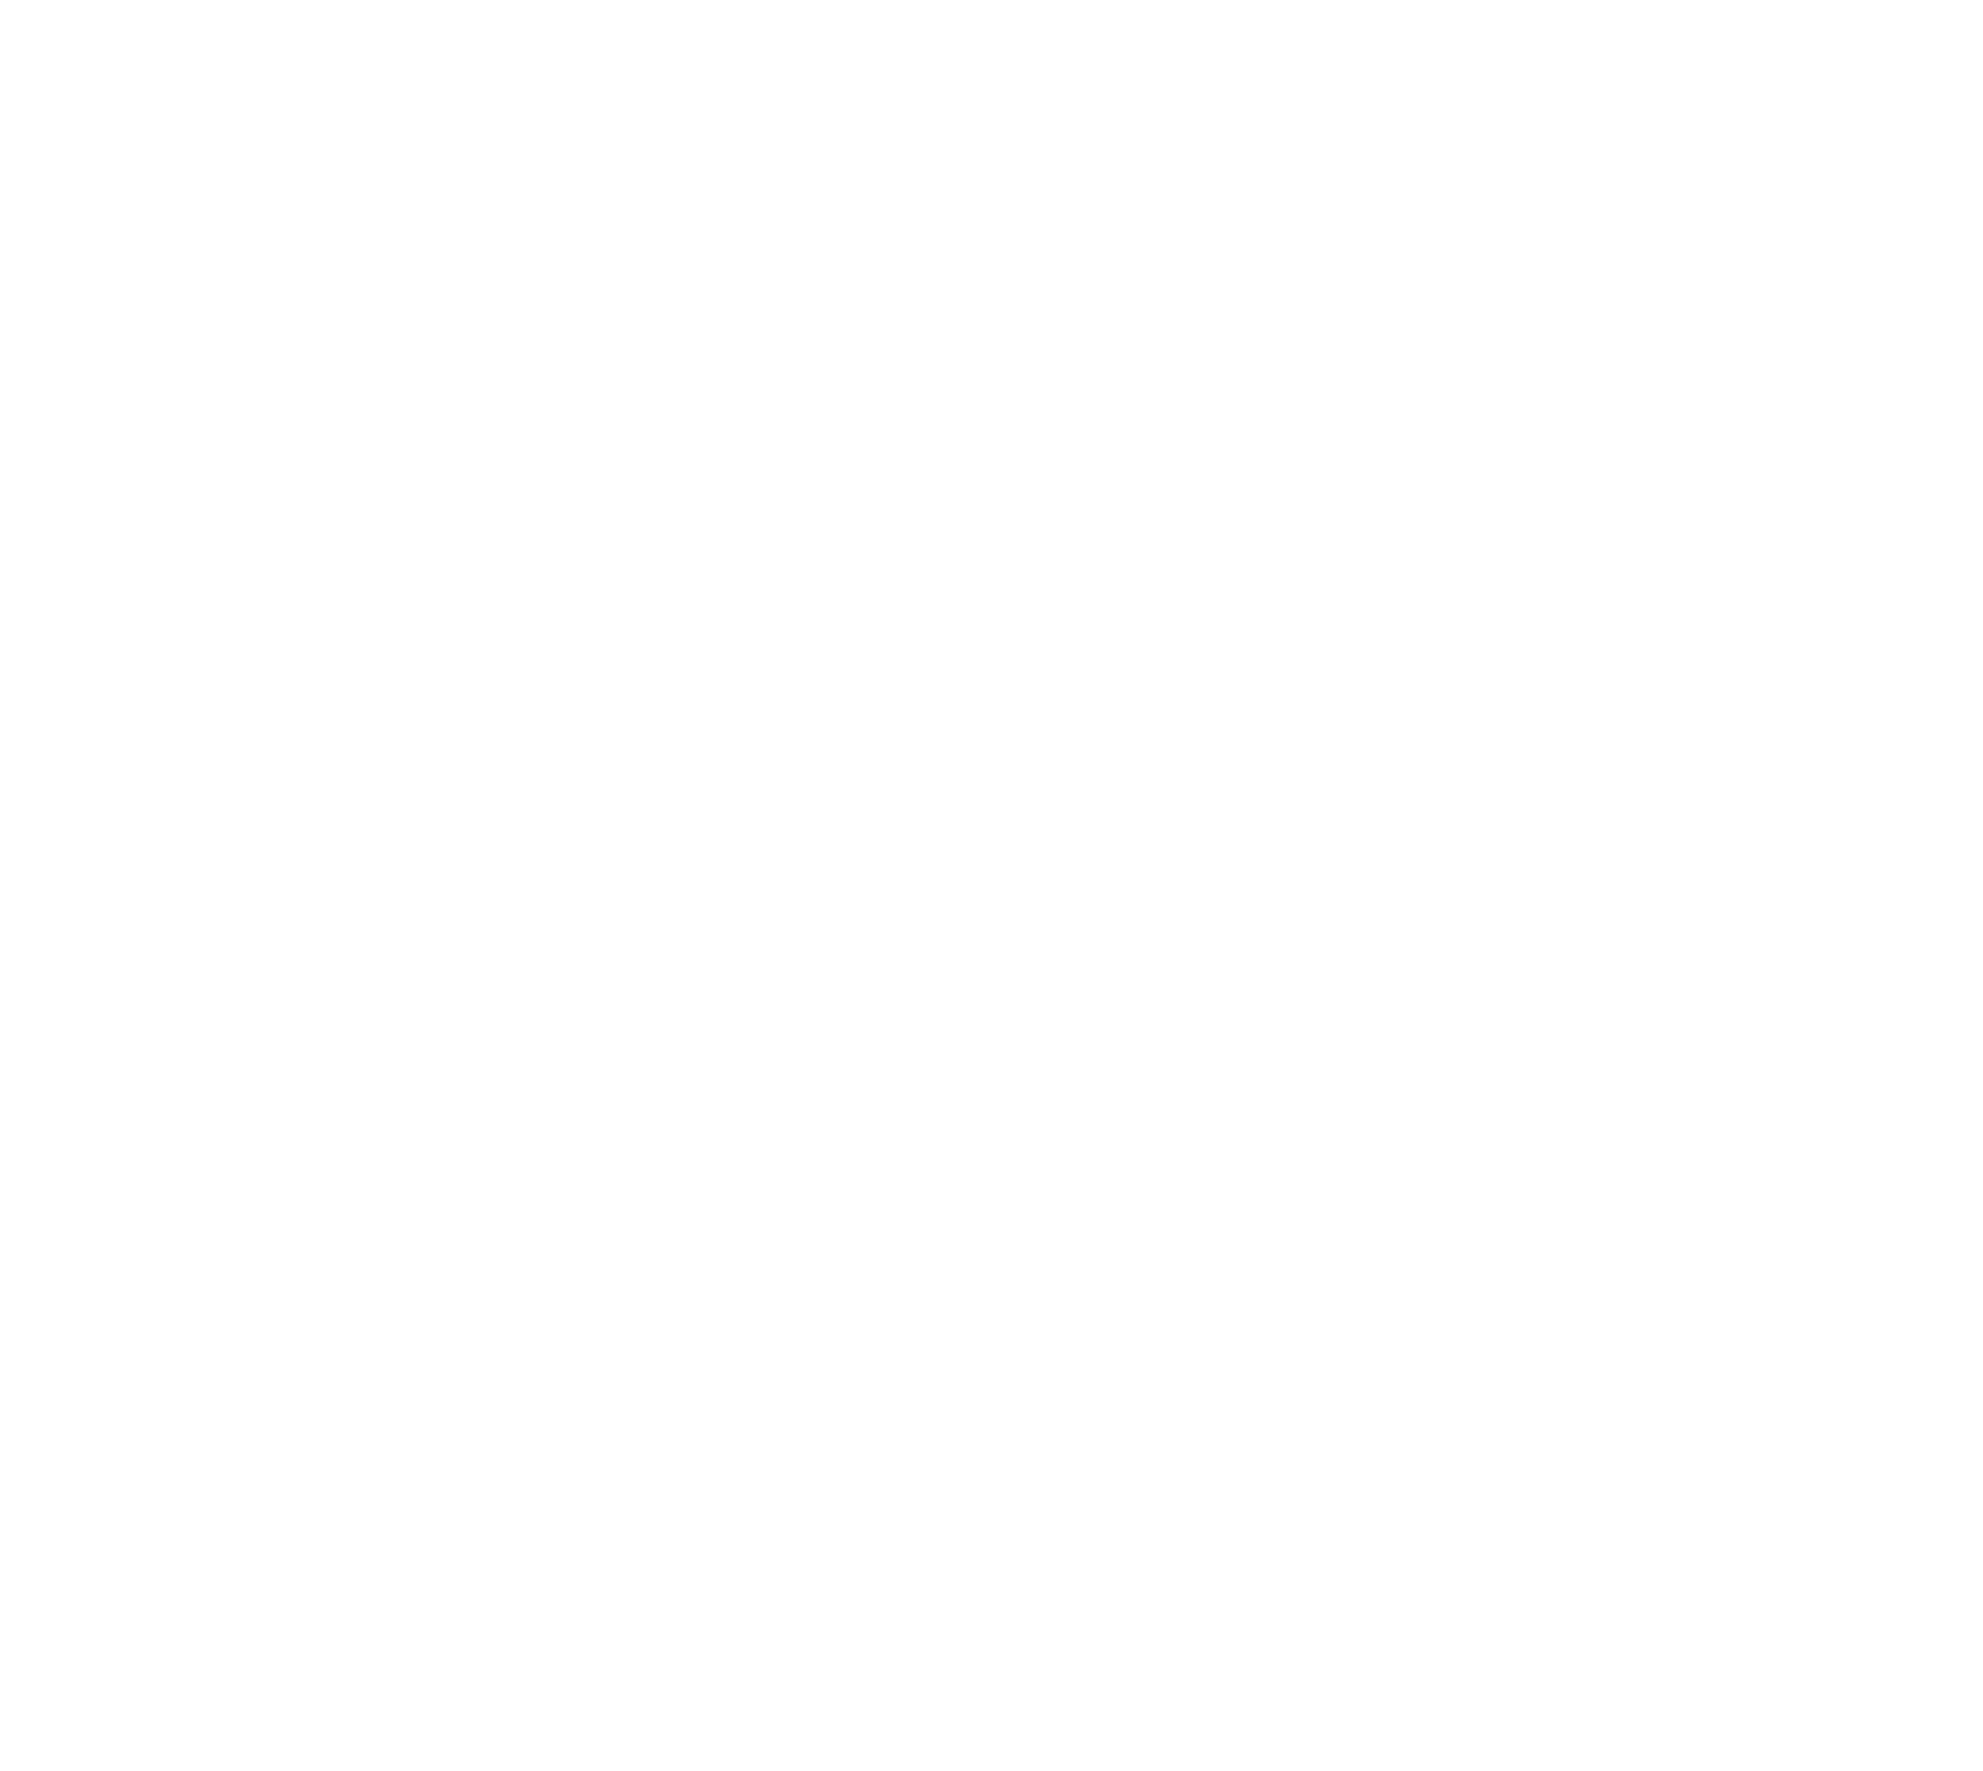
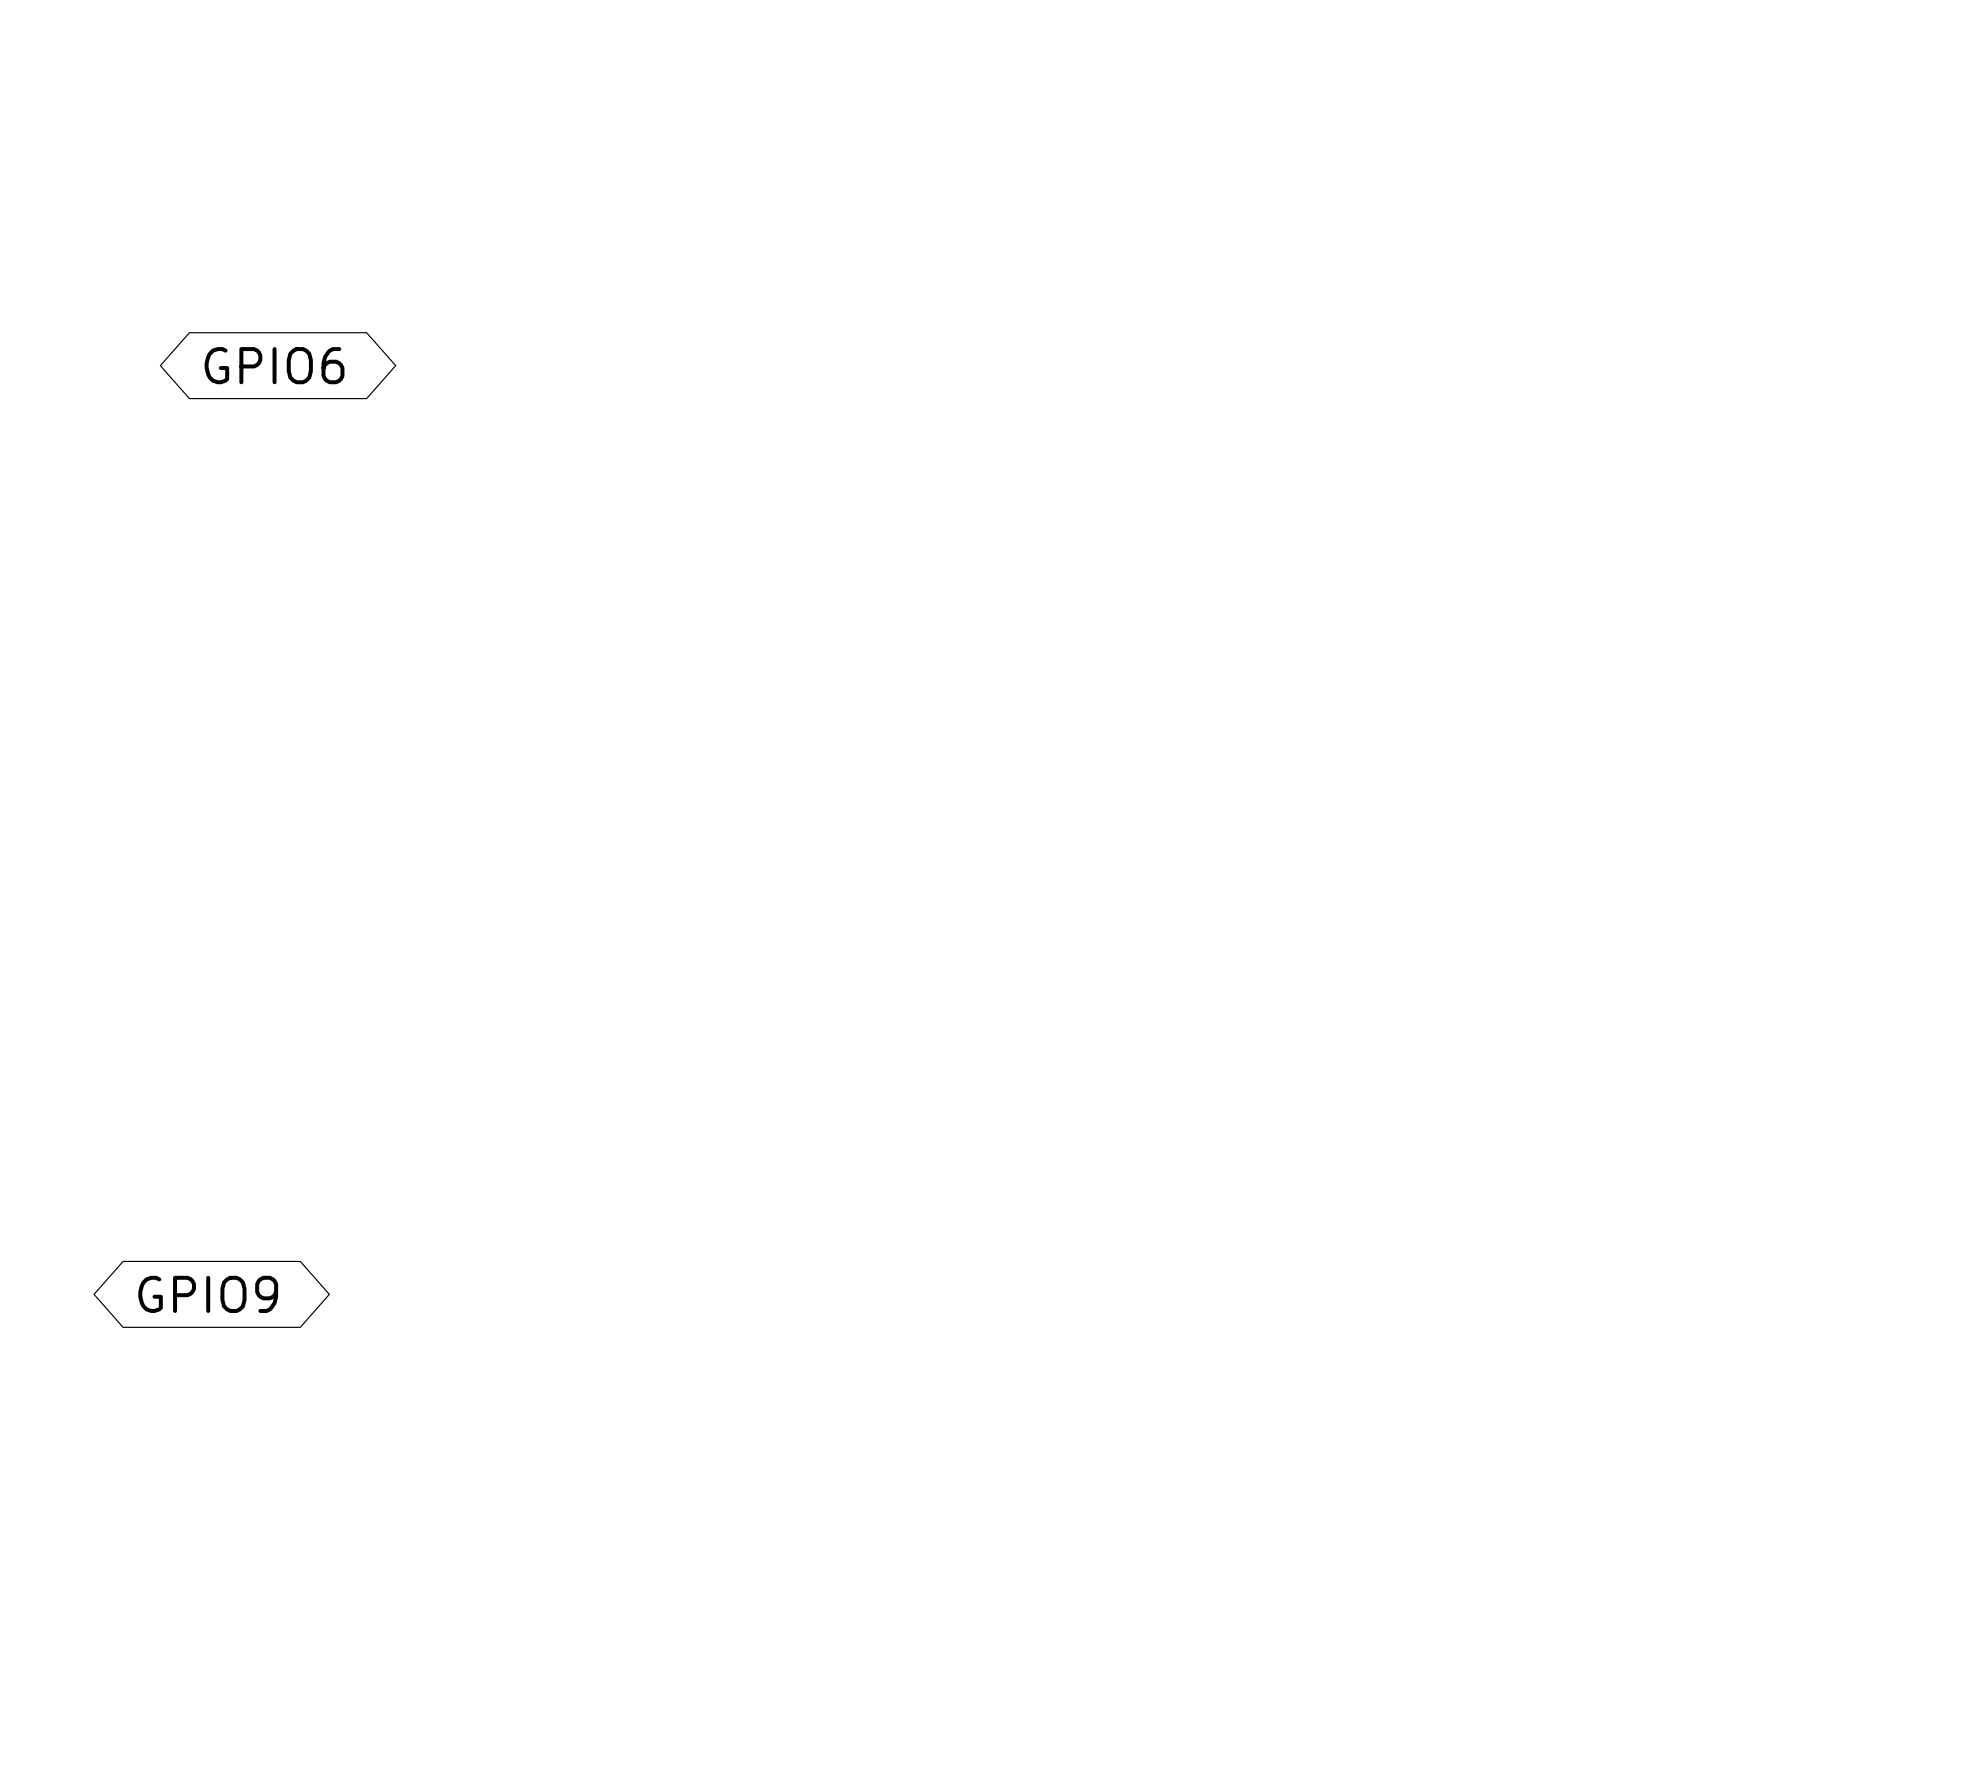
global label: none -> GPIO6 (274, 365)
global label: none -> GPIO9 (208, 1294)

